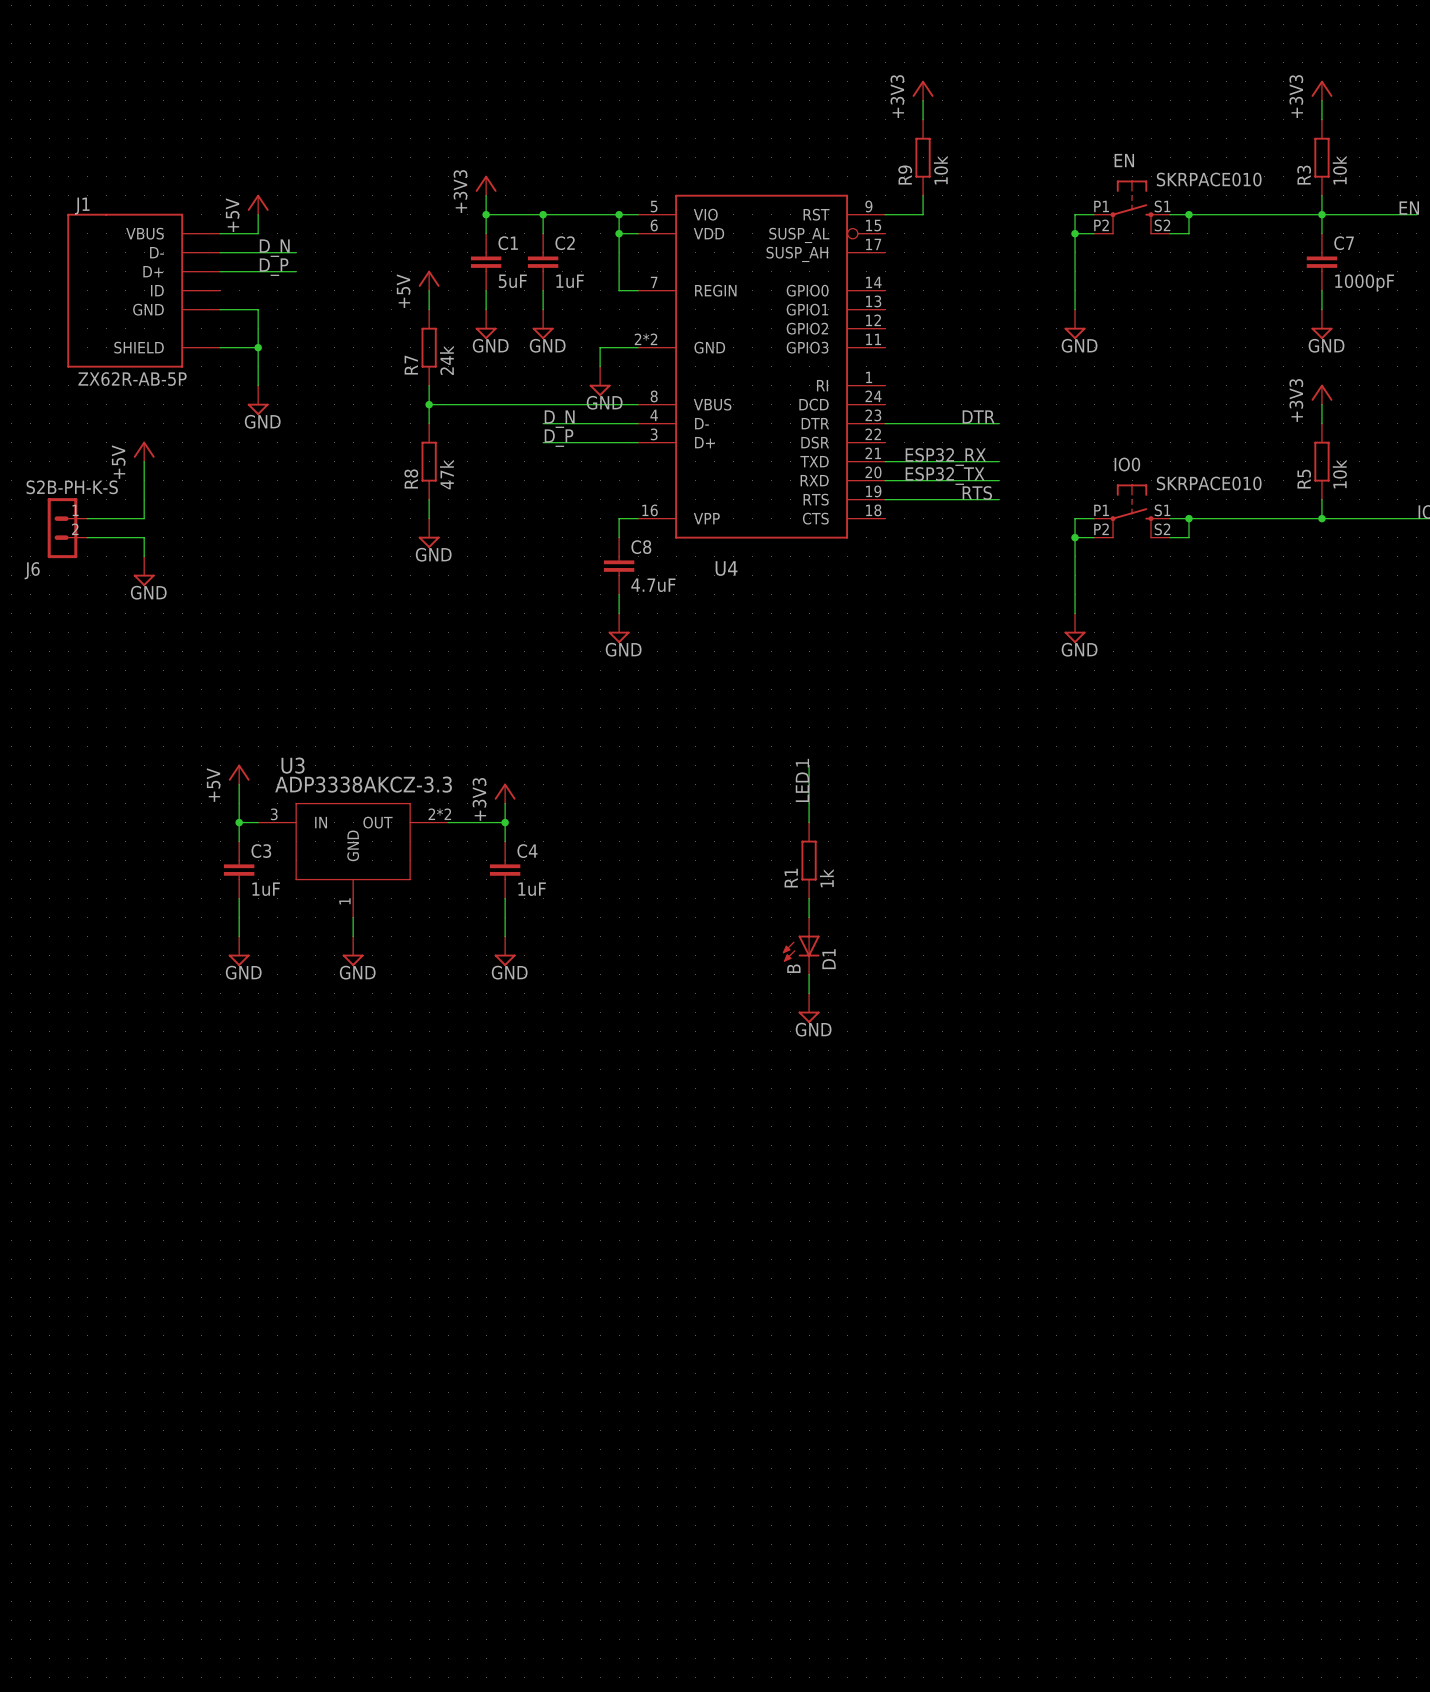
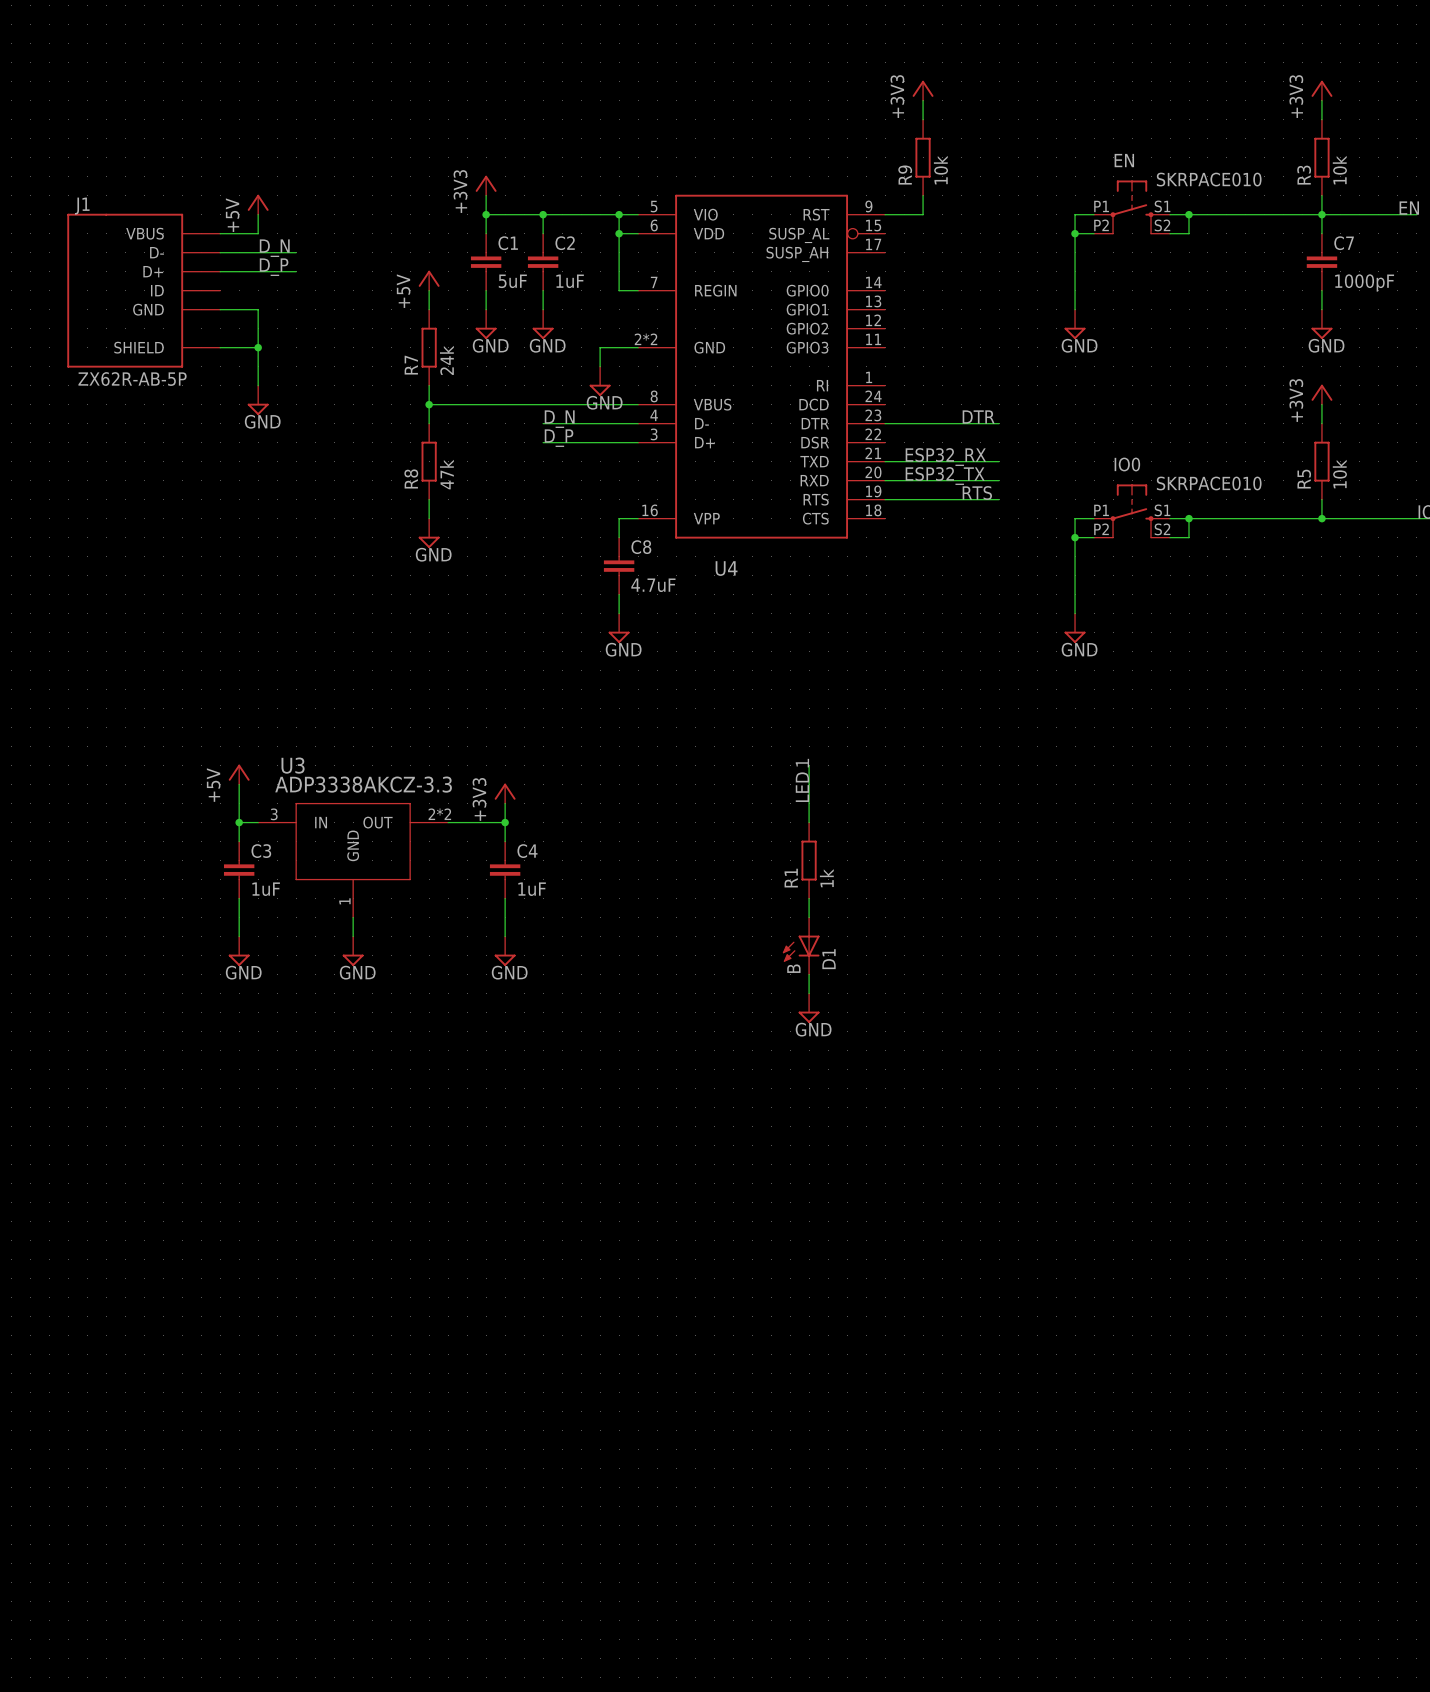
power symbol: +5V (144, 451) -> none
wire: (144, 461) (144, 518) (87, 518) -> none
J6: S2B-PH-K-S (67, 528) -> none
wire: (87, 537) (144, 537) (144, 556) -> none
power symbol: GND (144, 571) -> none

